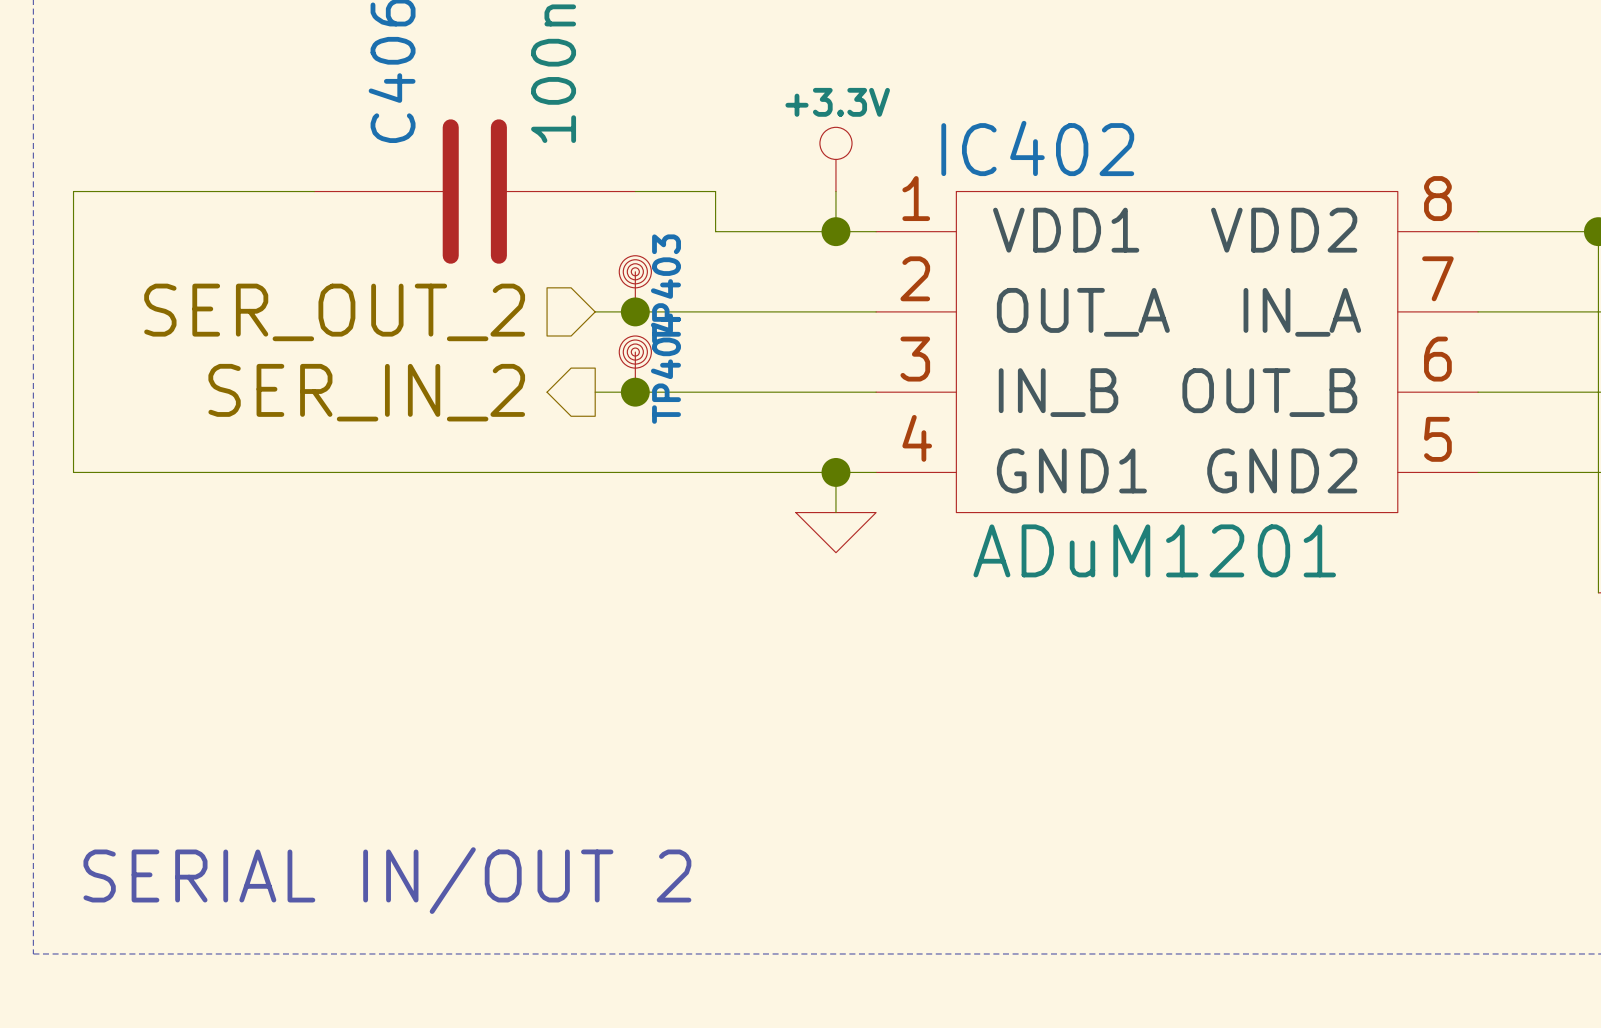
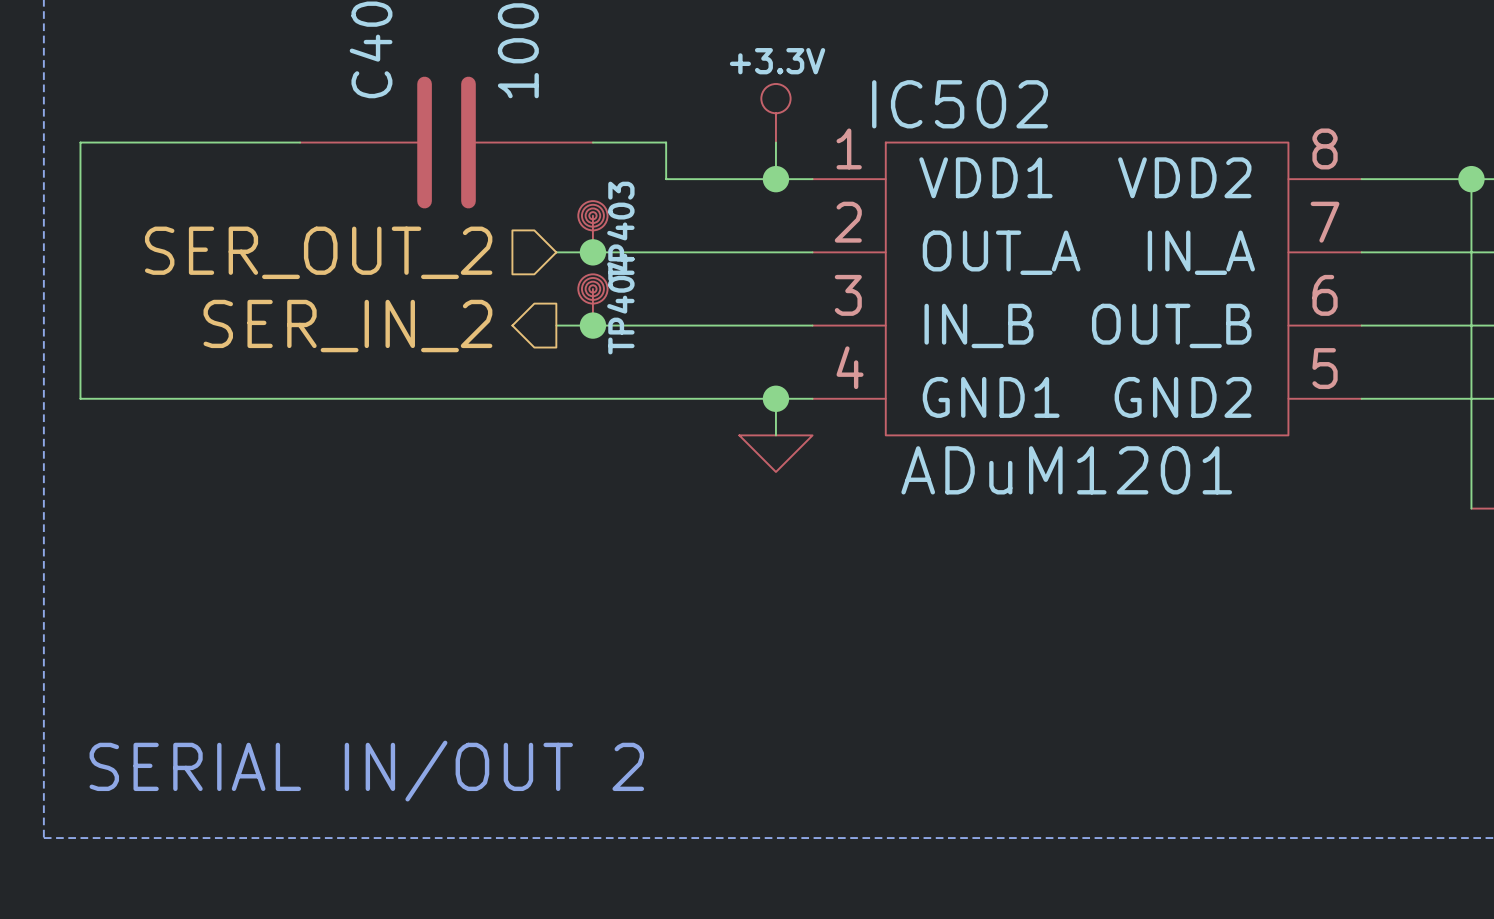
IC402 name: IC402 (1037, 148) -> IC502 (960, 104)

